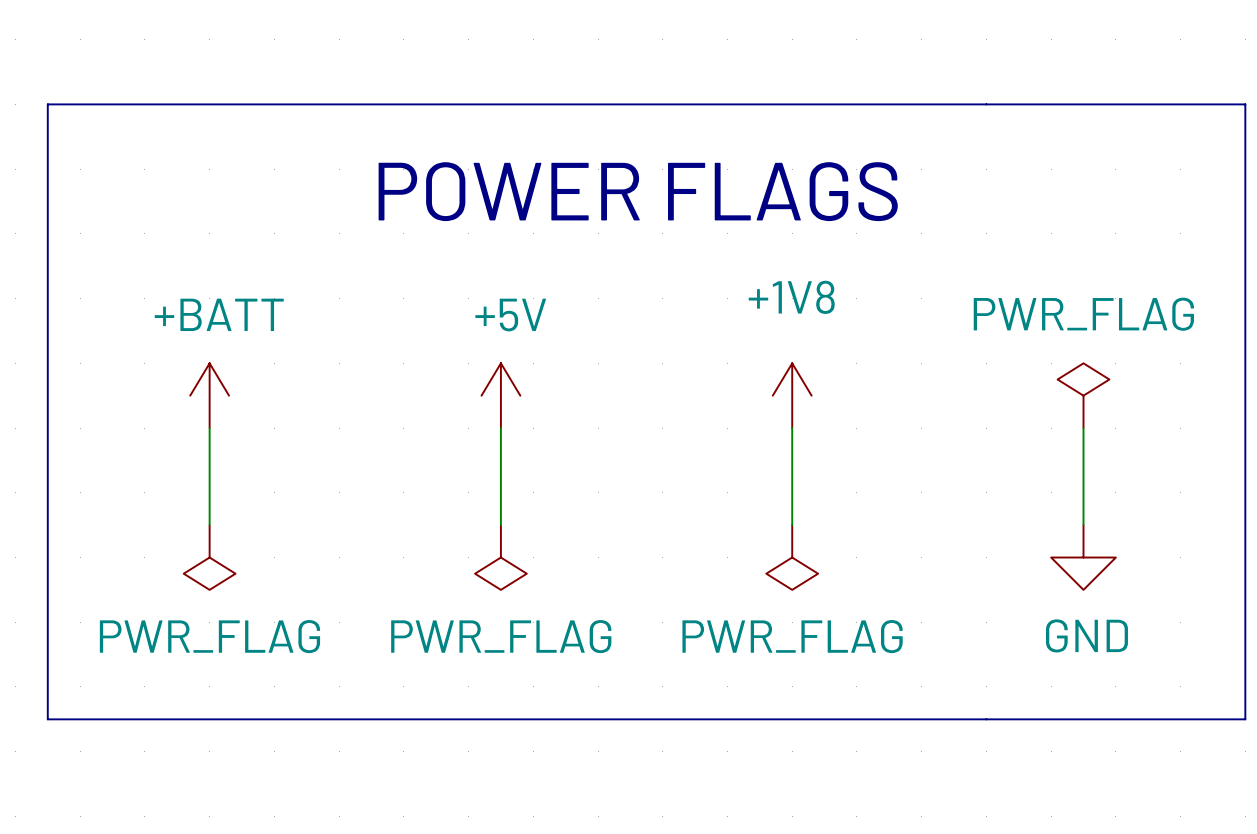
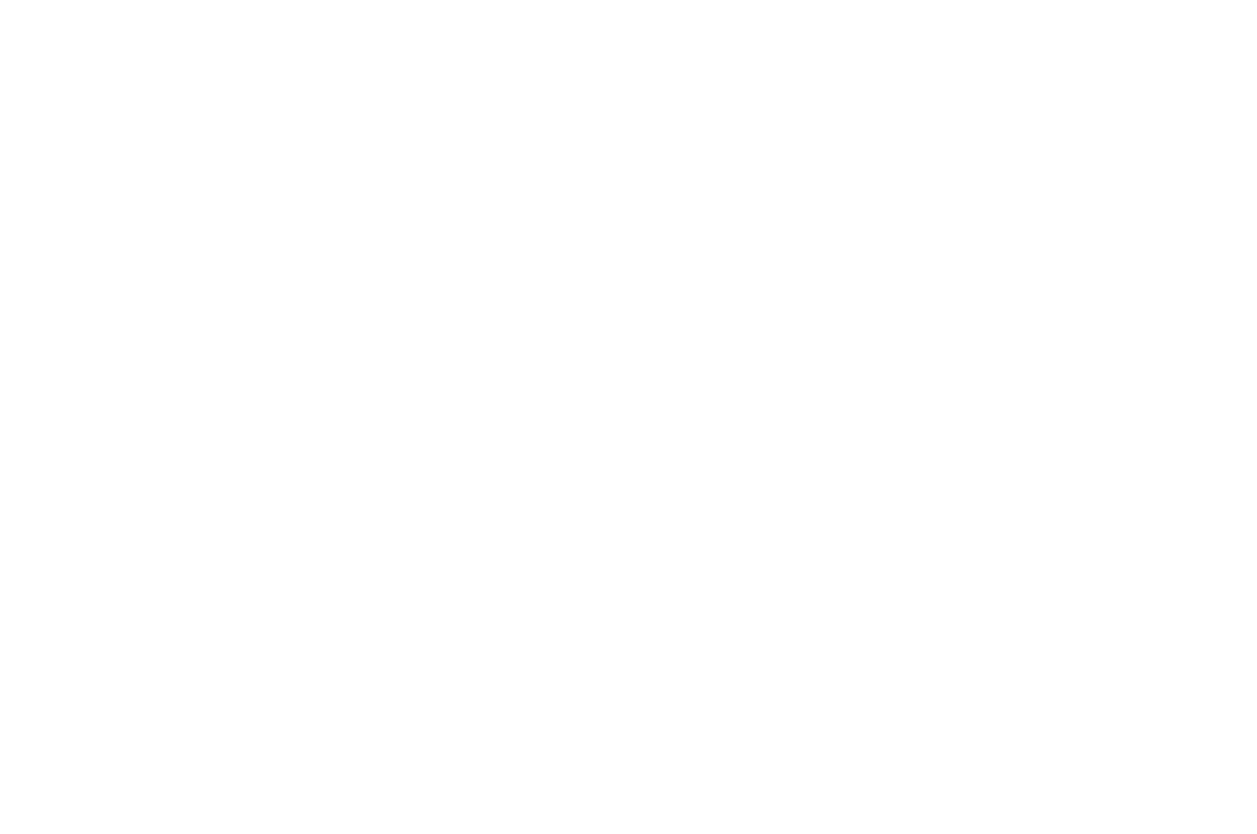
line: (47, 104) (1245, 104) (1245, 719) (47, 719) (47, 104) -> none
text: POWER FLAGS (638, 191) -> none
power symbol: +BATT (209, 395) -> none
power symbol: +5V (500, 395) -> none
power symbol: +1V8 (792, 395) -> none
power symbol: PWR_FLAG (1083, 395) -> none
wire: (209, 428) (209, 525) -> none
wire: (500, 428) (500, 525) -> none
wire: (792, 428) (792, 525) -> none
wire: (1083, 428) (1083, 525) -> none
power symbol: PWR_FLAG (209, 557) -> none
power symbol: PWR_FLAG (500, 557) -> none
power symbol: PWR_FLAG (792, 557) -> none
power symbol: GND (1083, 557) -> none

